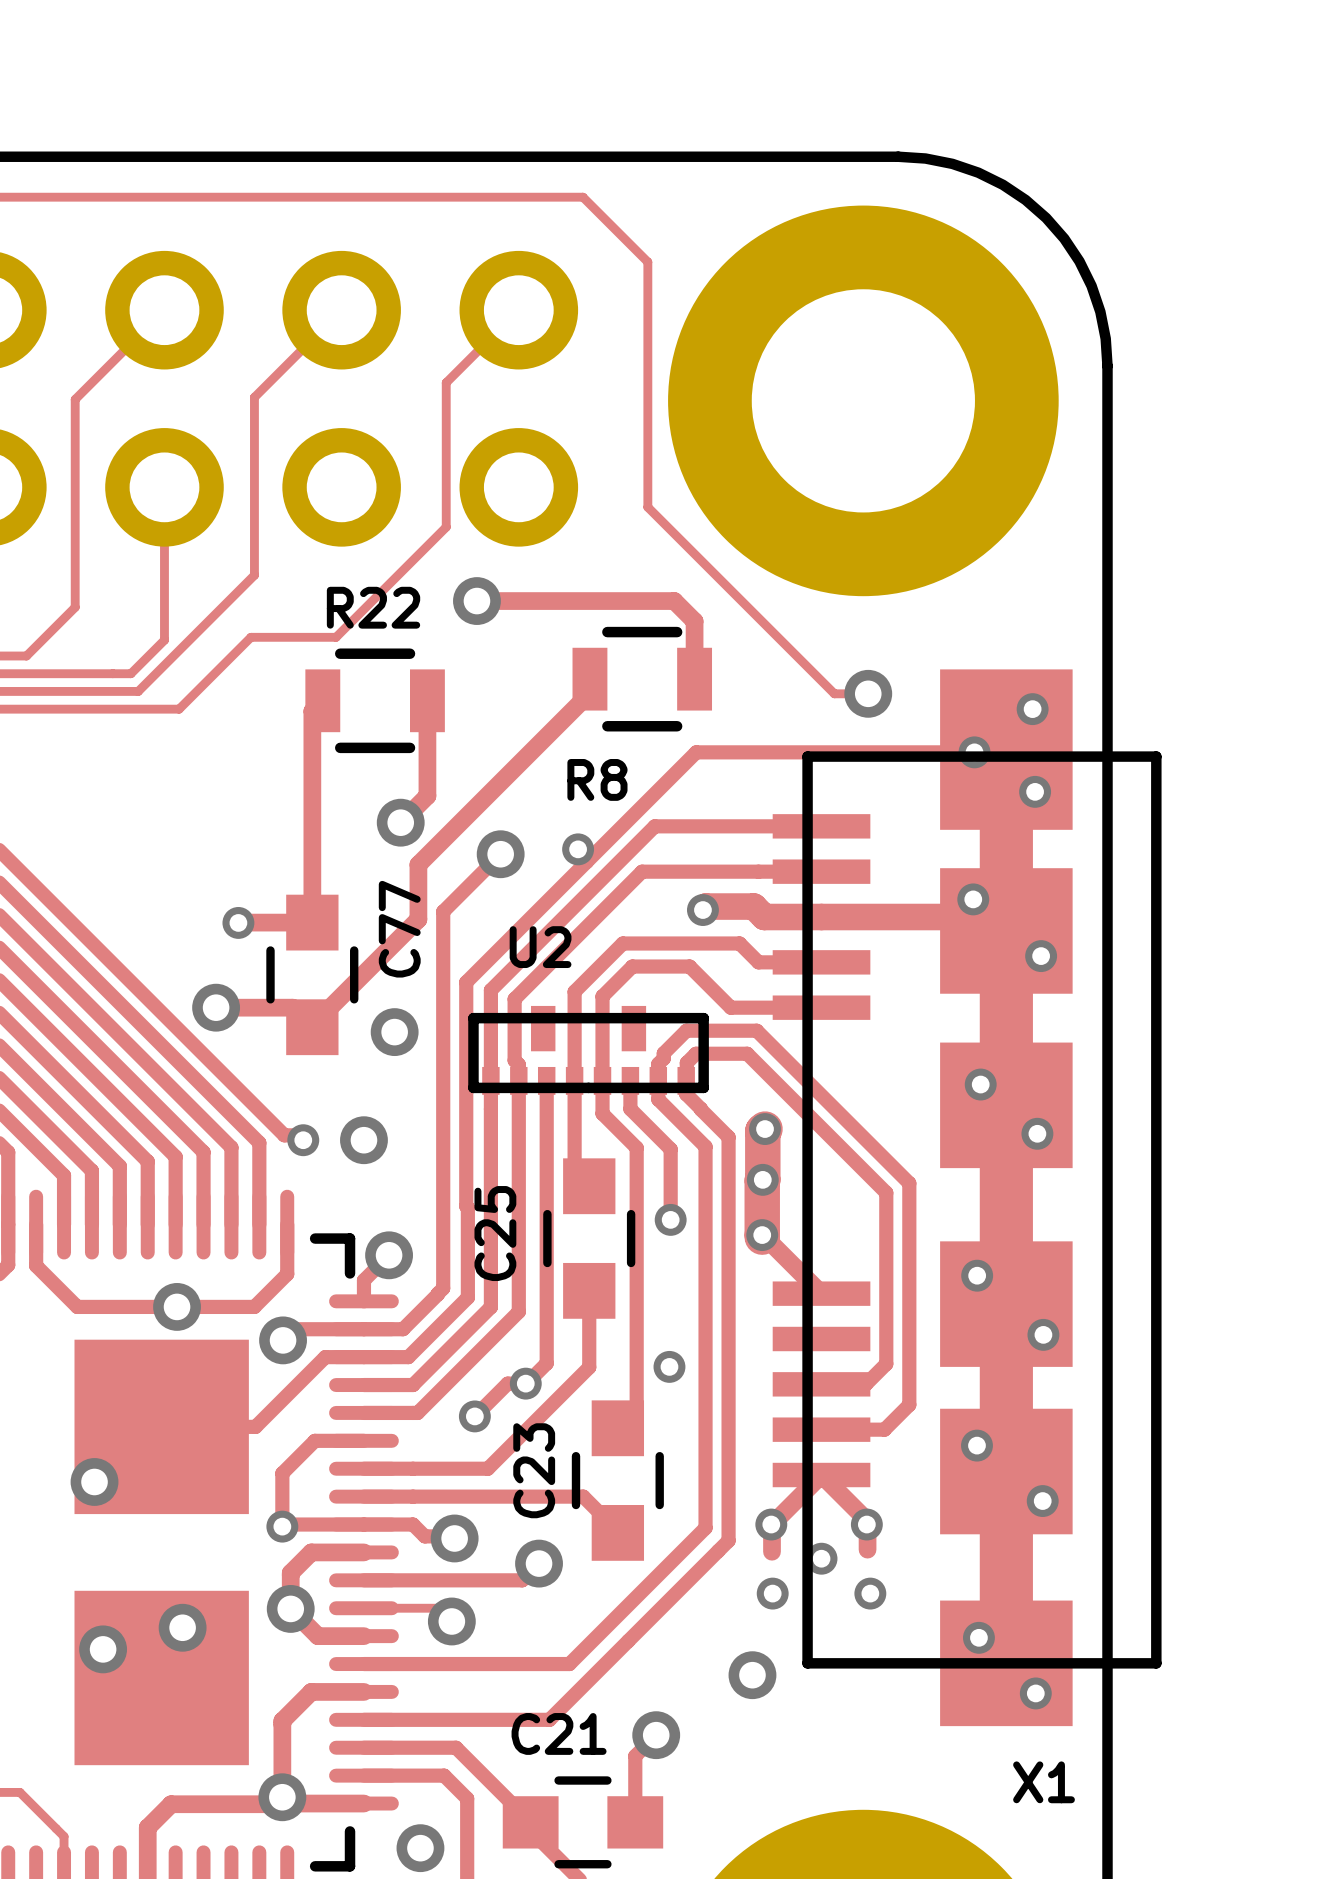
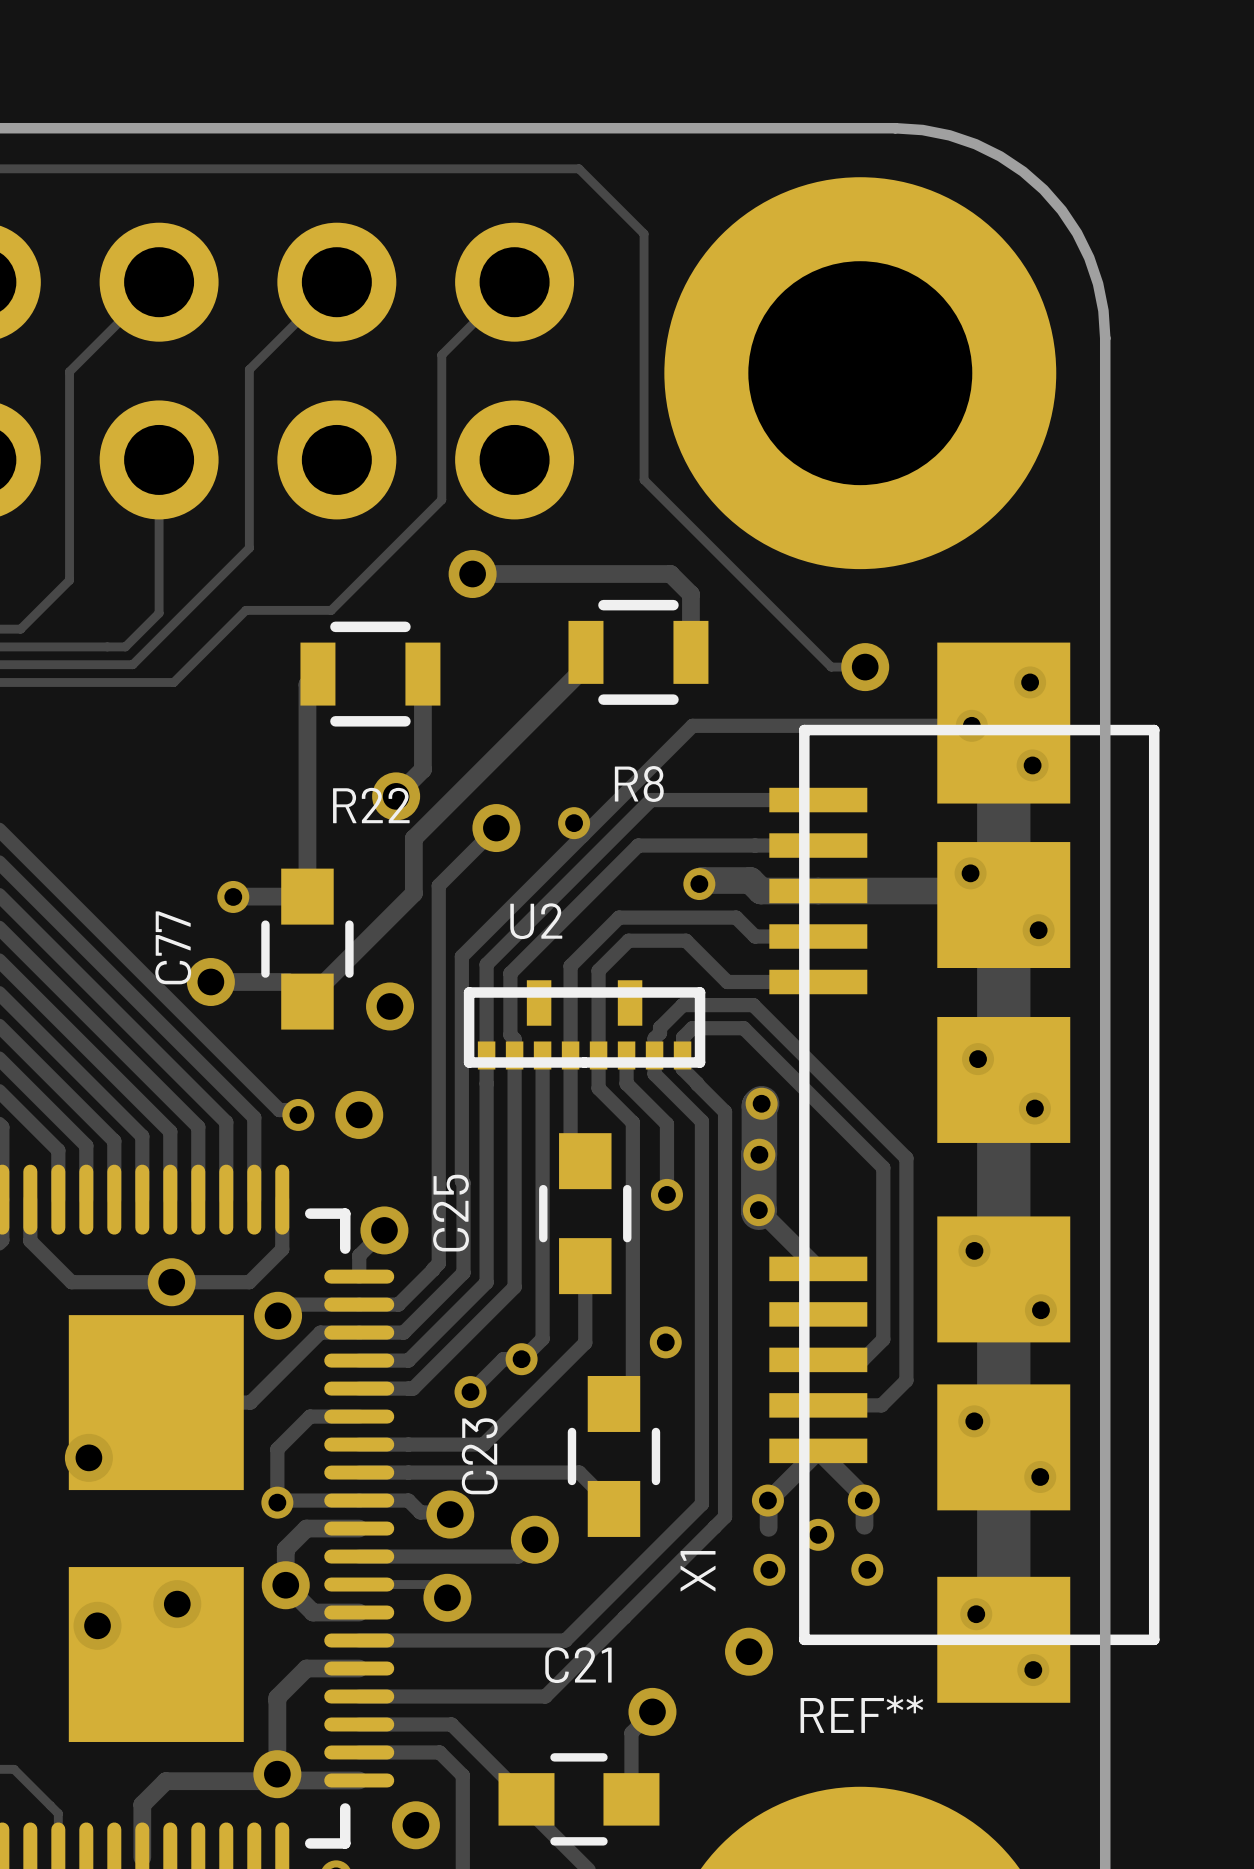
R22 name position: R22 (373, 607) -> R22 (371, 805)
R8 name position: R8 (597, 779) -> R8 (639, 783)
C77 name position: C77 (399, 929) -> C77 (173, 947)
C25 name position: C25 (495, 1233) -> C25 (451, 1213)
C23 name position: C23 (534, 1470) -> C23 (479, 1456)
C21 name position: C21 (559, 1733) -> C21 (578, 1665)
REF** name: none -> REF** (861, 1714)
X1 name rotation: 0° (1044, 1782) -> 90° counterclockwise (698, 1571)
X1 name position: X1 (1044, 1782) -> X1 (698, 1571)

